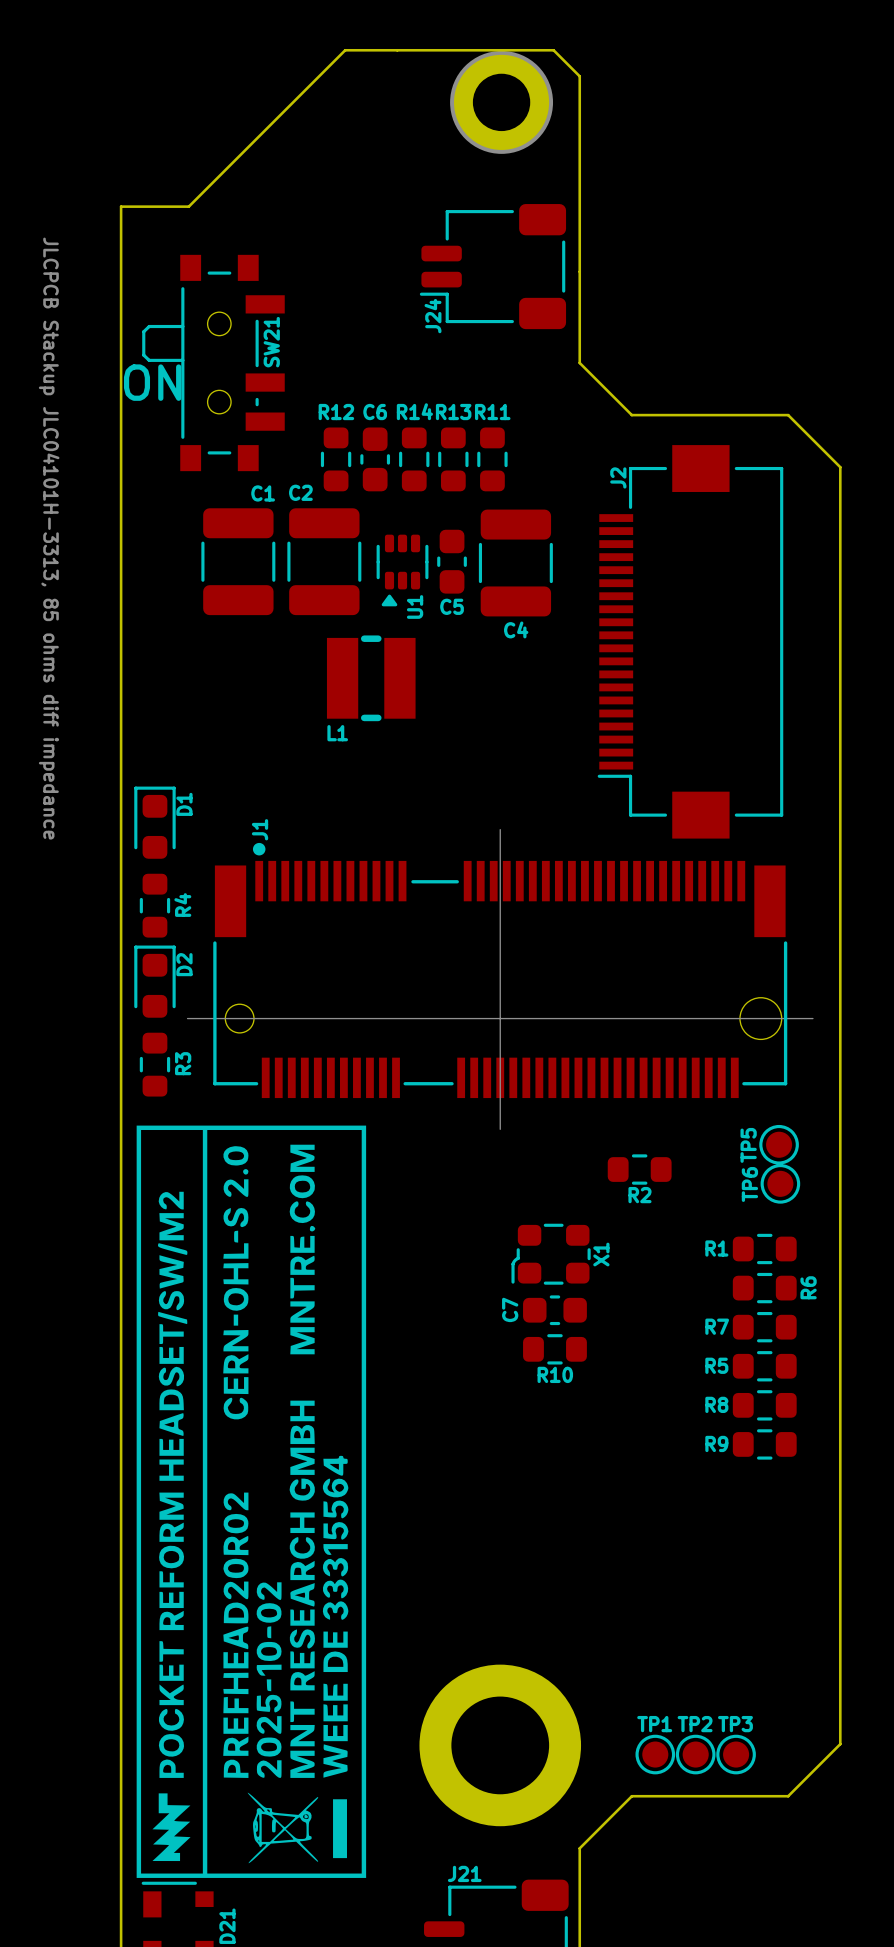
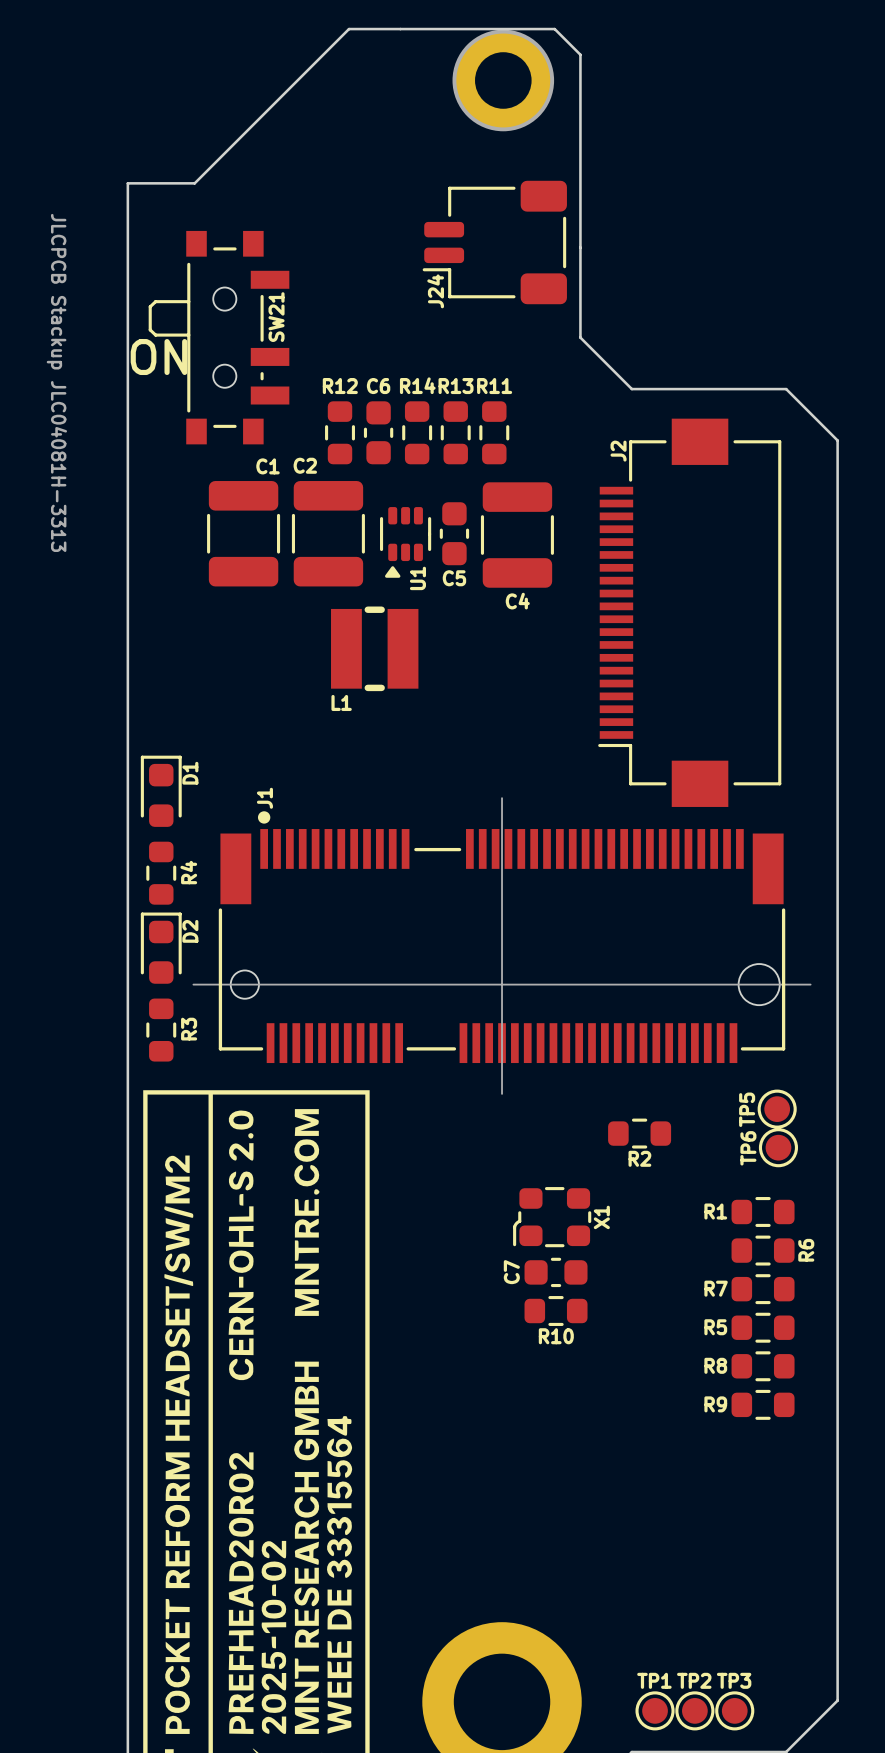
text: JLCPCB Stackup JLC04101H-3313, 85 ohms diff impedance (49, 538) -> JLCPCB Stackup JLC04081H-3313 (56, 382)

